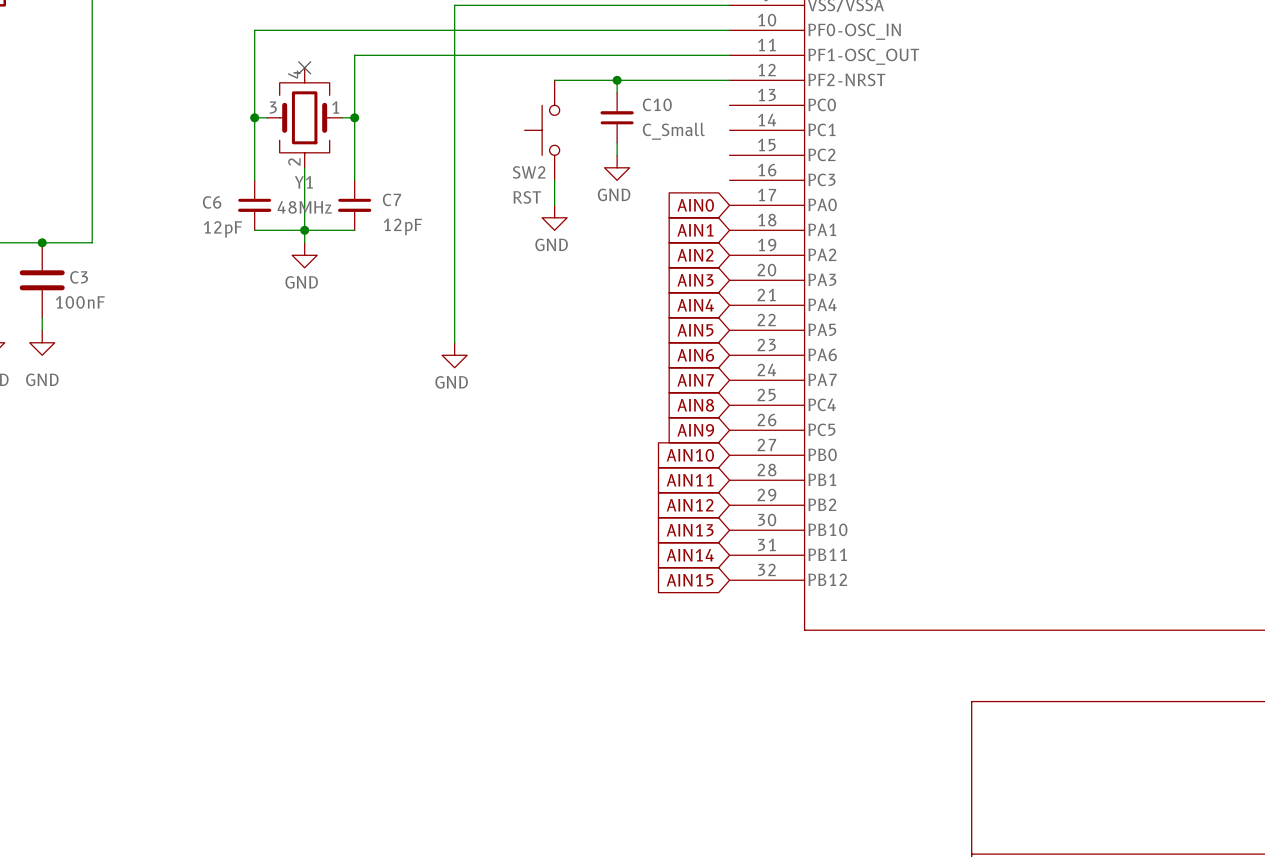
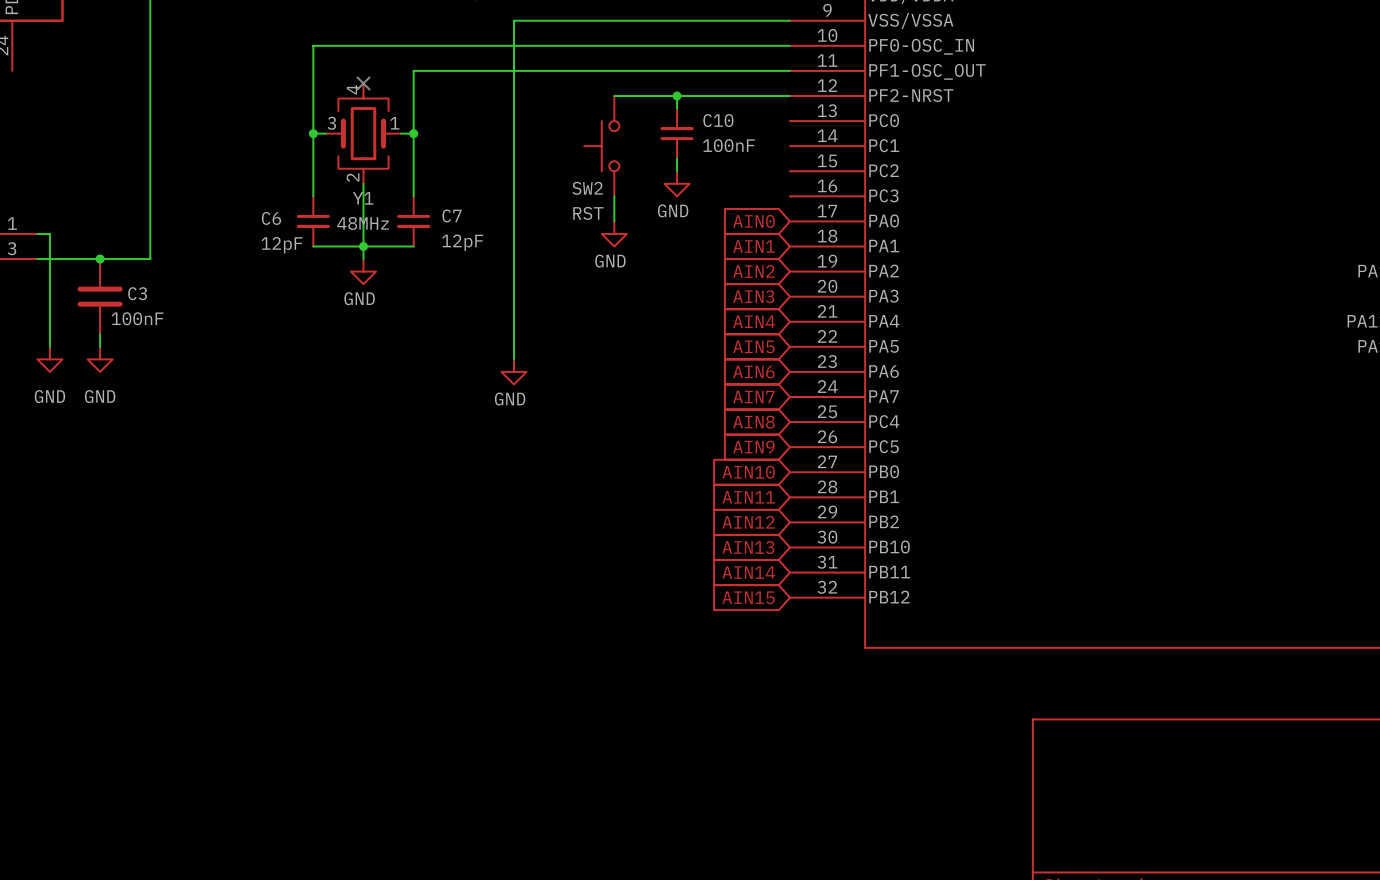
C10 value: C_Small (673, 131) -> 100nF (728, 145)

